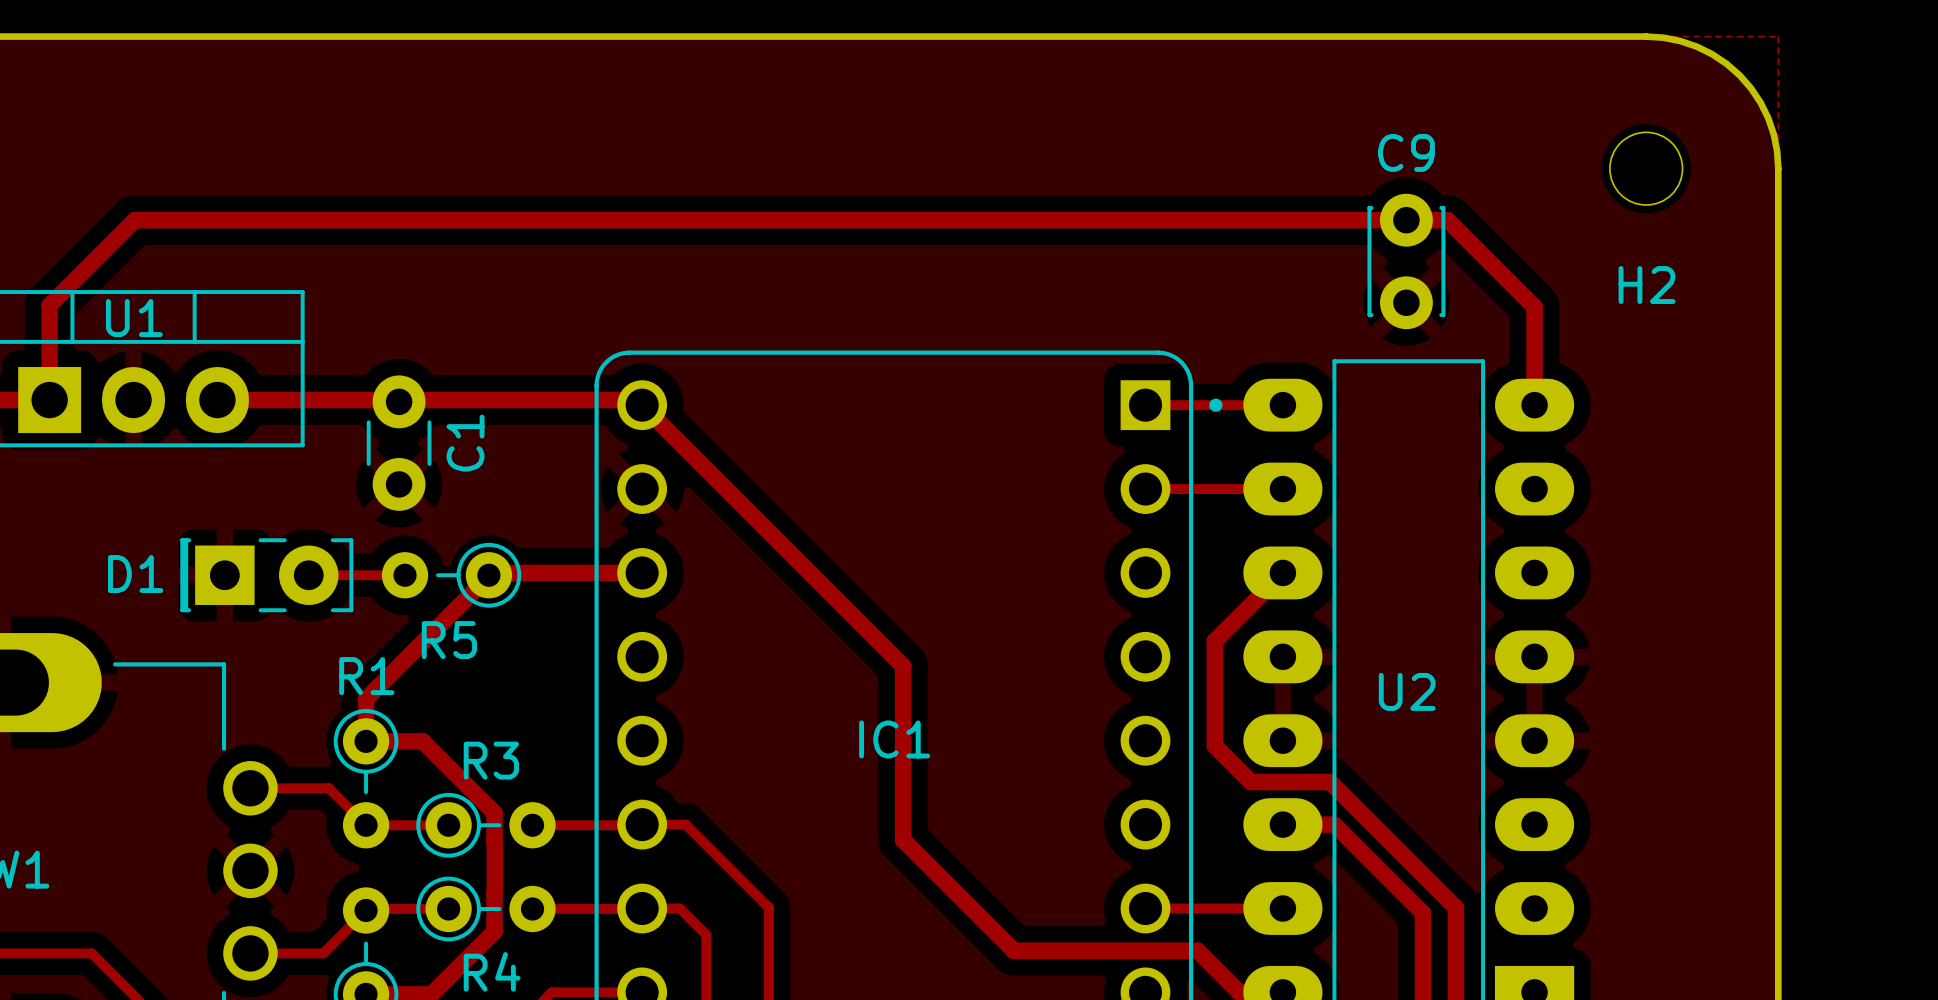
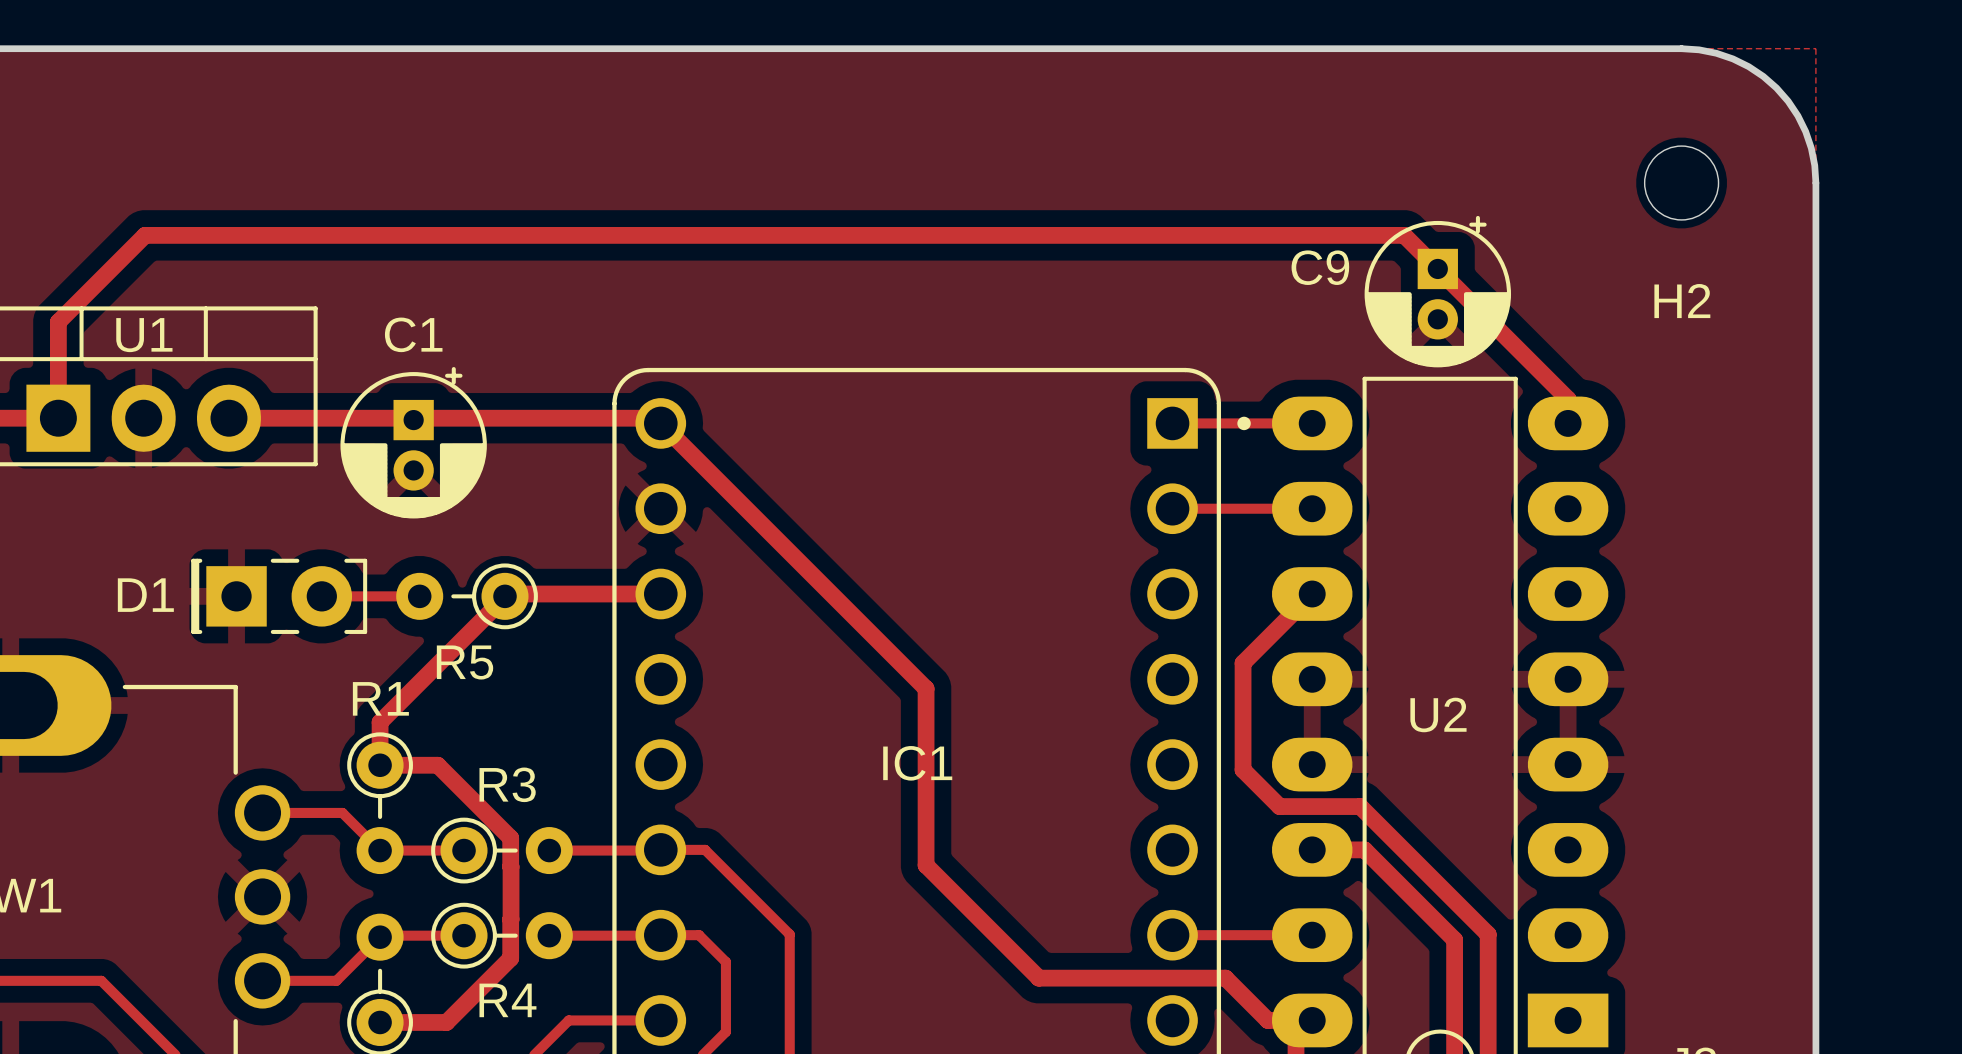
C9 name position: C9 (1406, 152) -> C9 (1320, 267)
C9 footprint: [1367, 193, 1446, 330] -> [1364, 215, 1512, 368]
top track: (1373, 220) (1447, 220) (1534, 307) (1534, 381) -> (1404, 235) (1568, 399)
C1 footprint: [366, 375, 432, 511] -> [340, 367, 487, 519]
C1 name position: C1 (465, 443) -> C1 (413, 334)

